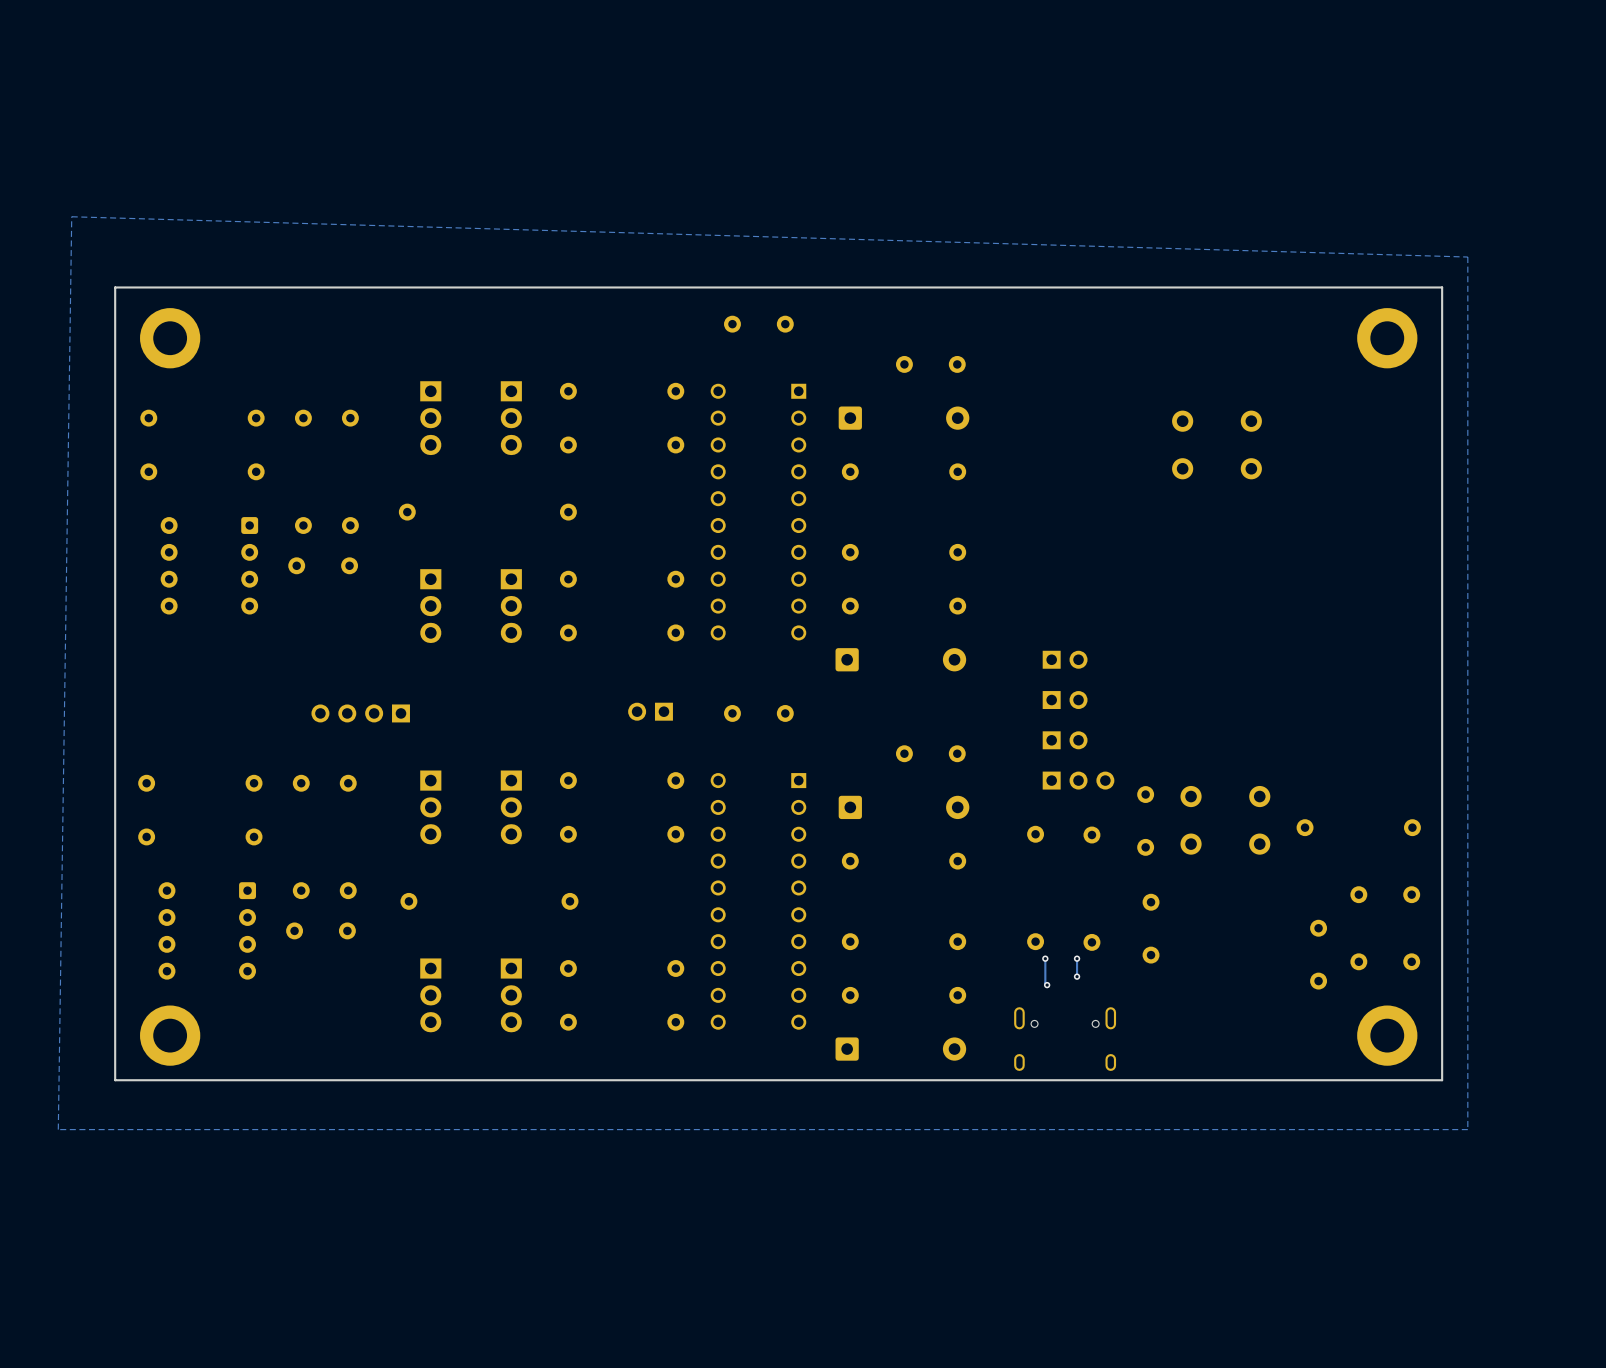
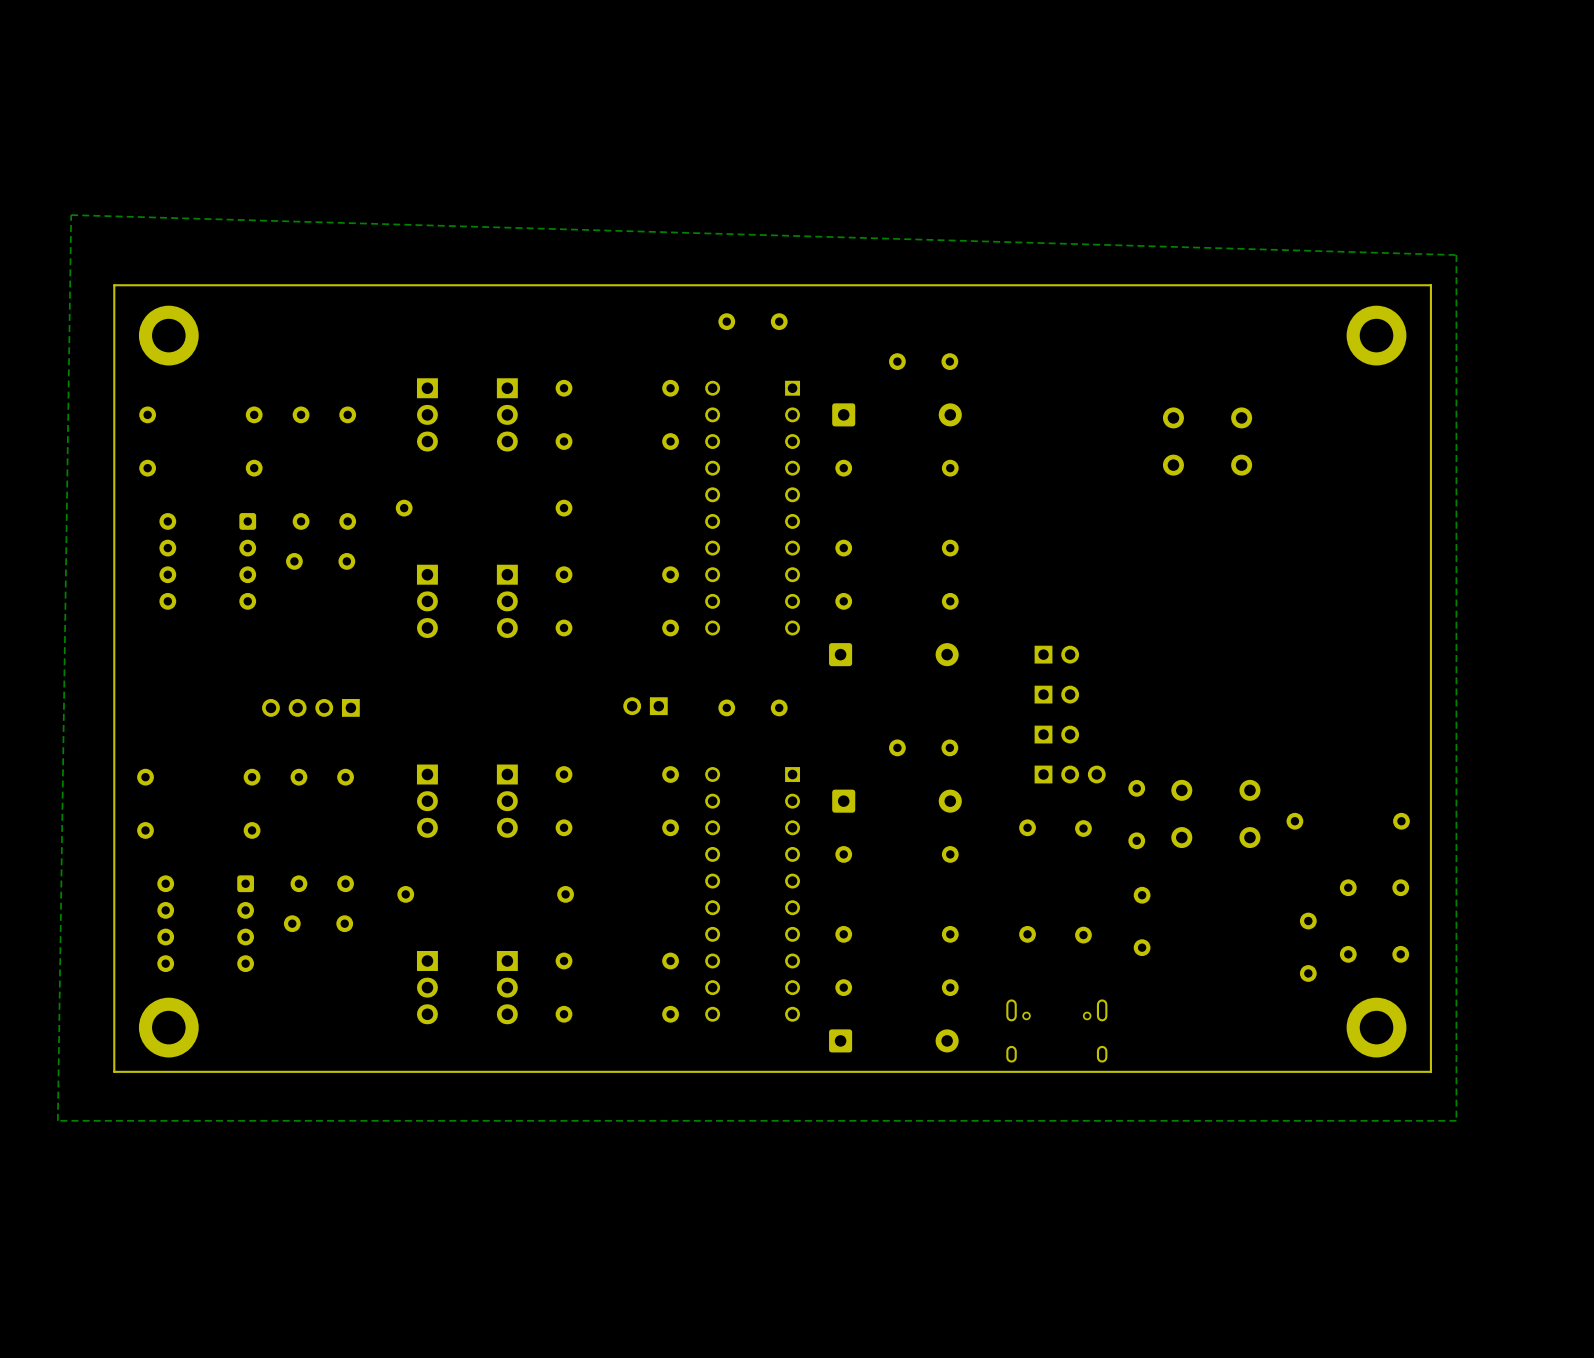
part position: (360, 713) -> (310, 707)
track: (1045, 958) (1045, 983) (1047, 985) -> none
via: (1045, 958) -> none
track: (1077, 958) (1077, 976) -> none
via: (1077, 958) -> none
via: (1077, 976) -> none
via: (1047, 985) -> none

